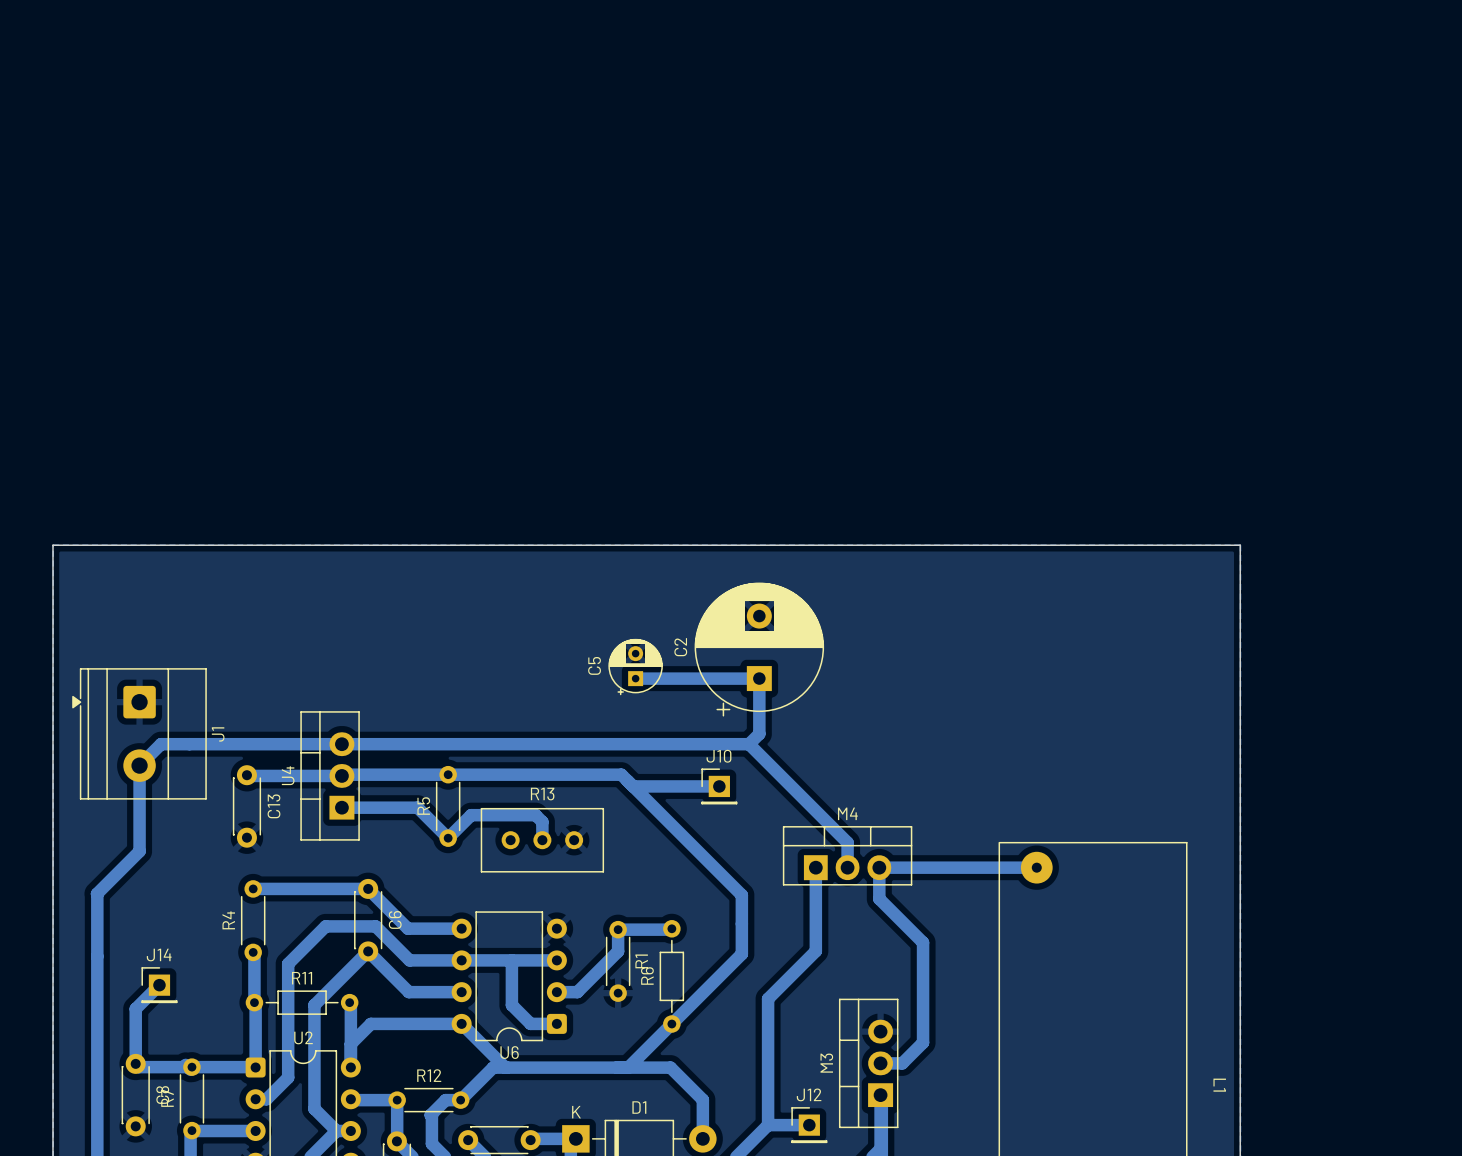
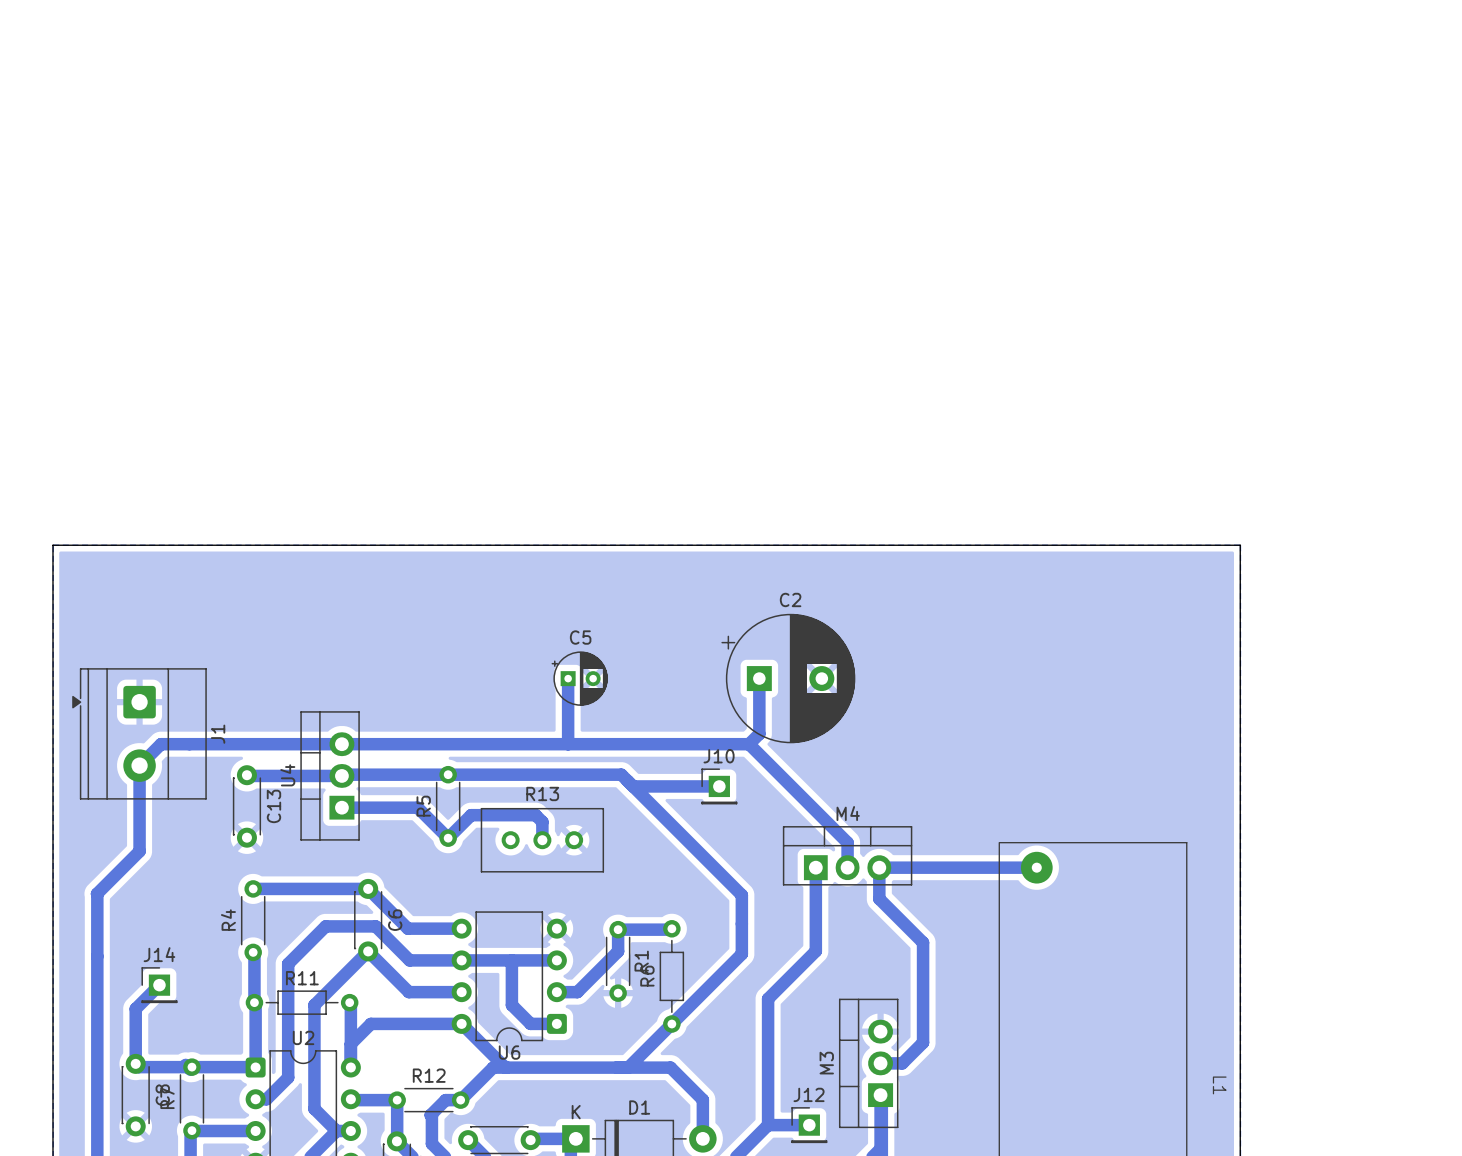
C2 rotation: 0° (759, 649) -> 90° clockwise (788, 678)
C5 rotation: 0° (635, 667) -> 90° clockwise (579, 678)
C5 position: (635, 667) -> (579, 678)
bottom track: none -> (568, 678) (568, 744)
bottom track: (635, 678) (759, 678) -> none

